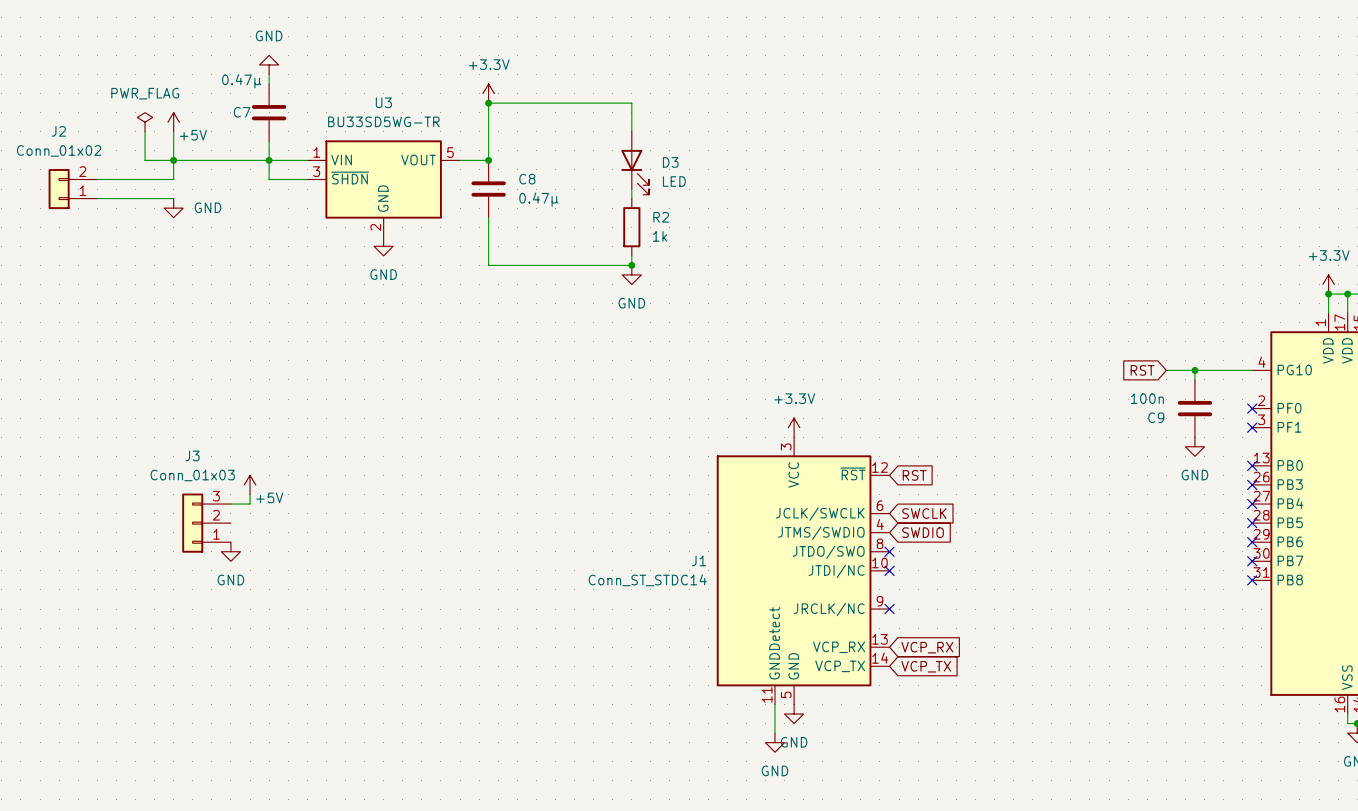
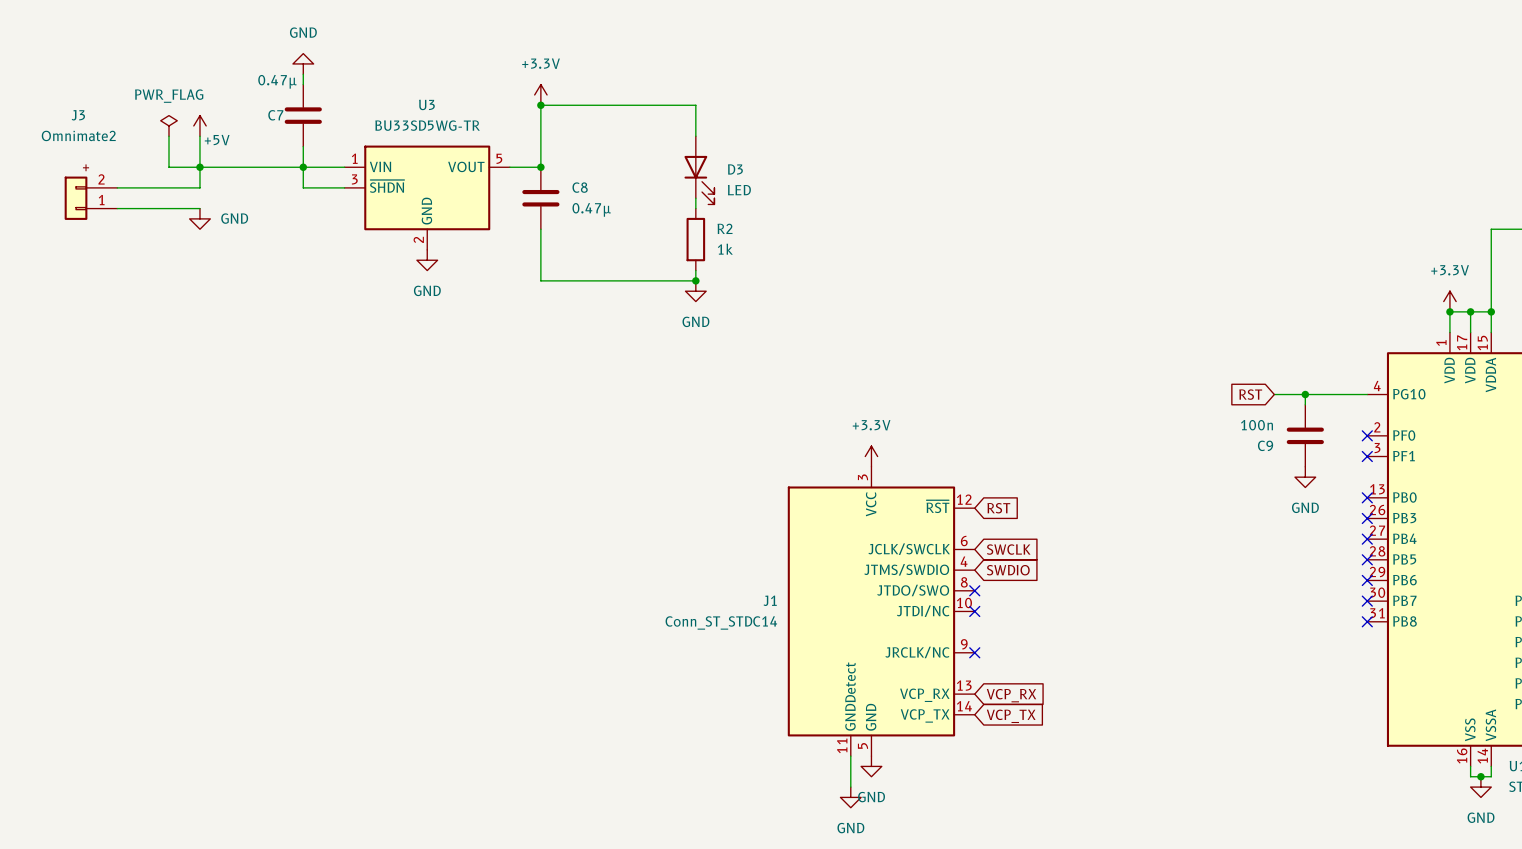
J2: Conn_01x02 (72, 189) -> none
J3 value: Conn_01x03 (192, 475) -> Omnimate2 (78, 135)
power symbol: +5V (250, 484) -> none
J3 symbol: [182, 493, 231, 553] -> [64, 176, 118, 220]
wire: (250, 494) (250, 504) (230, 504) -> none
power symbol: GND (230, 551) -> none

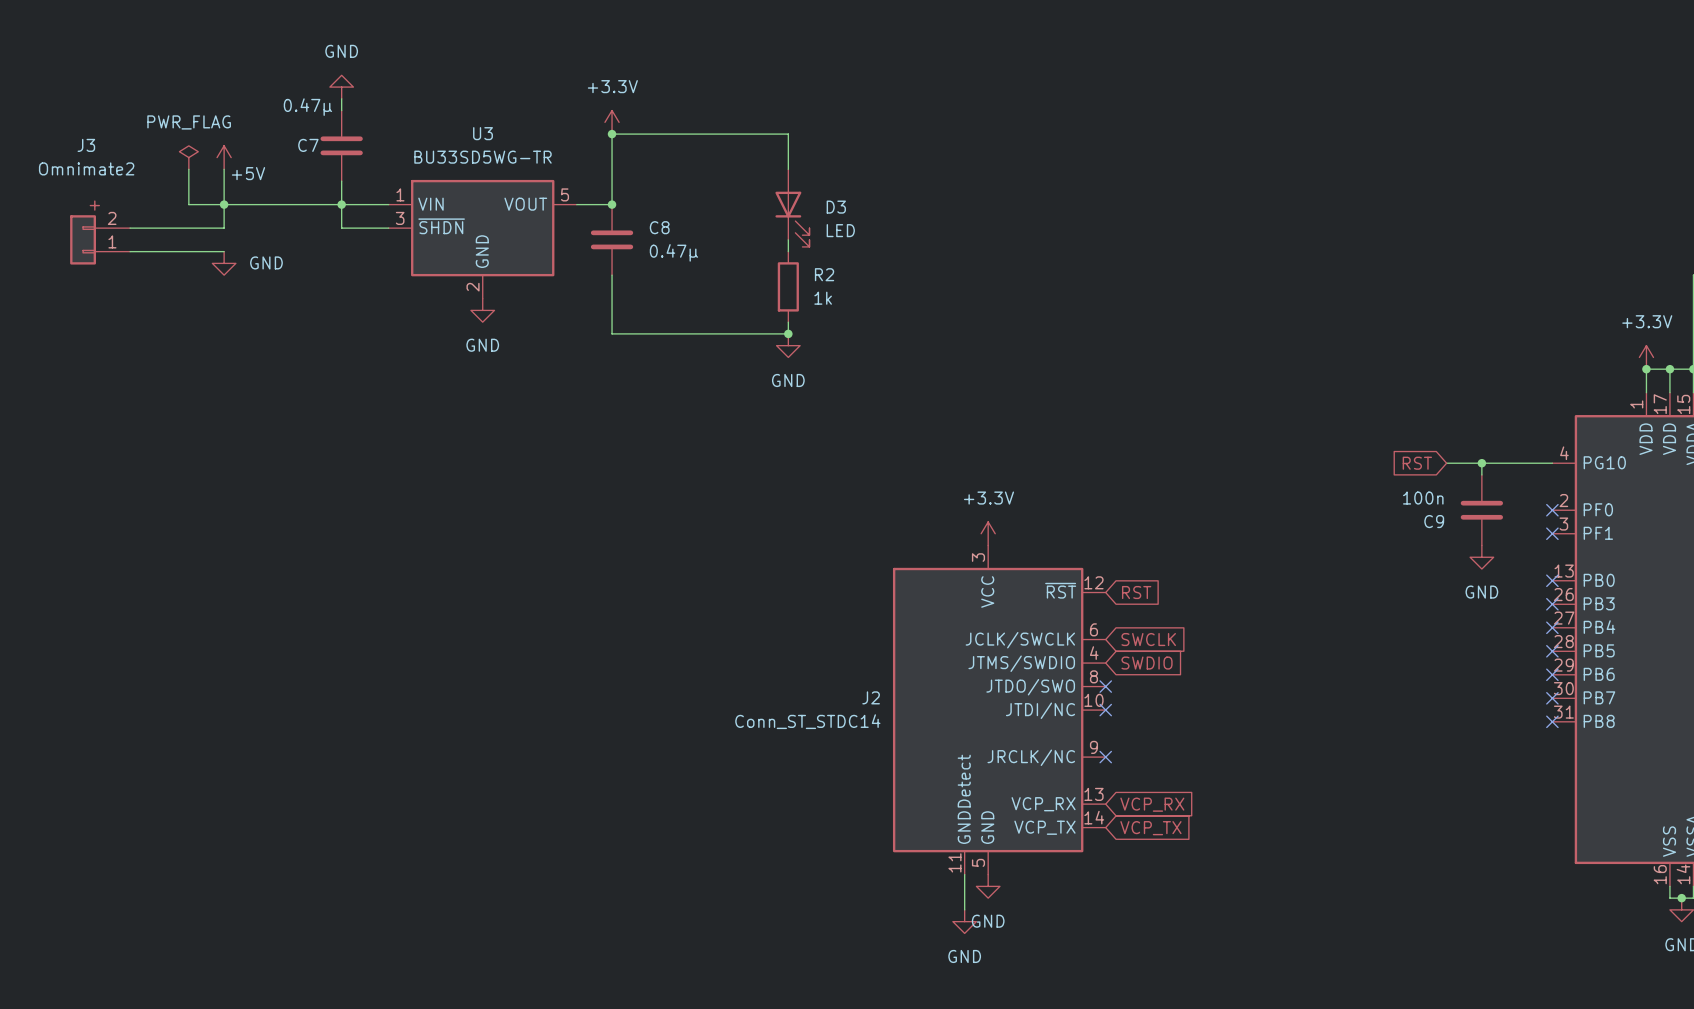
J1 name: J1 (770, 600) -> J2 (871, 697)

